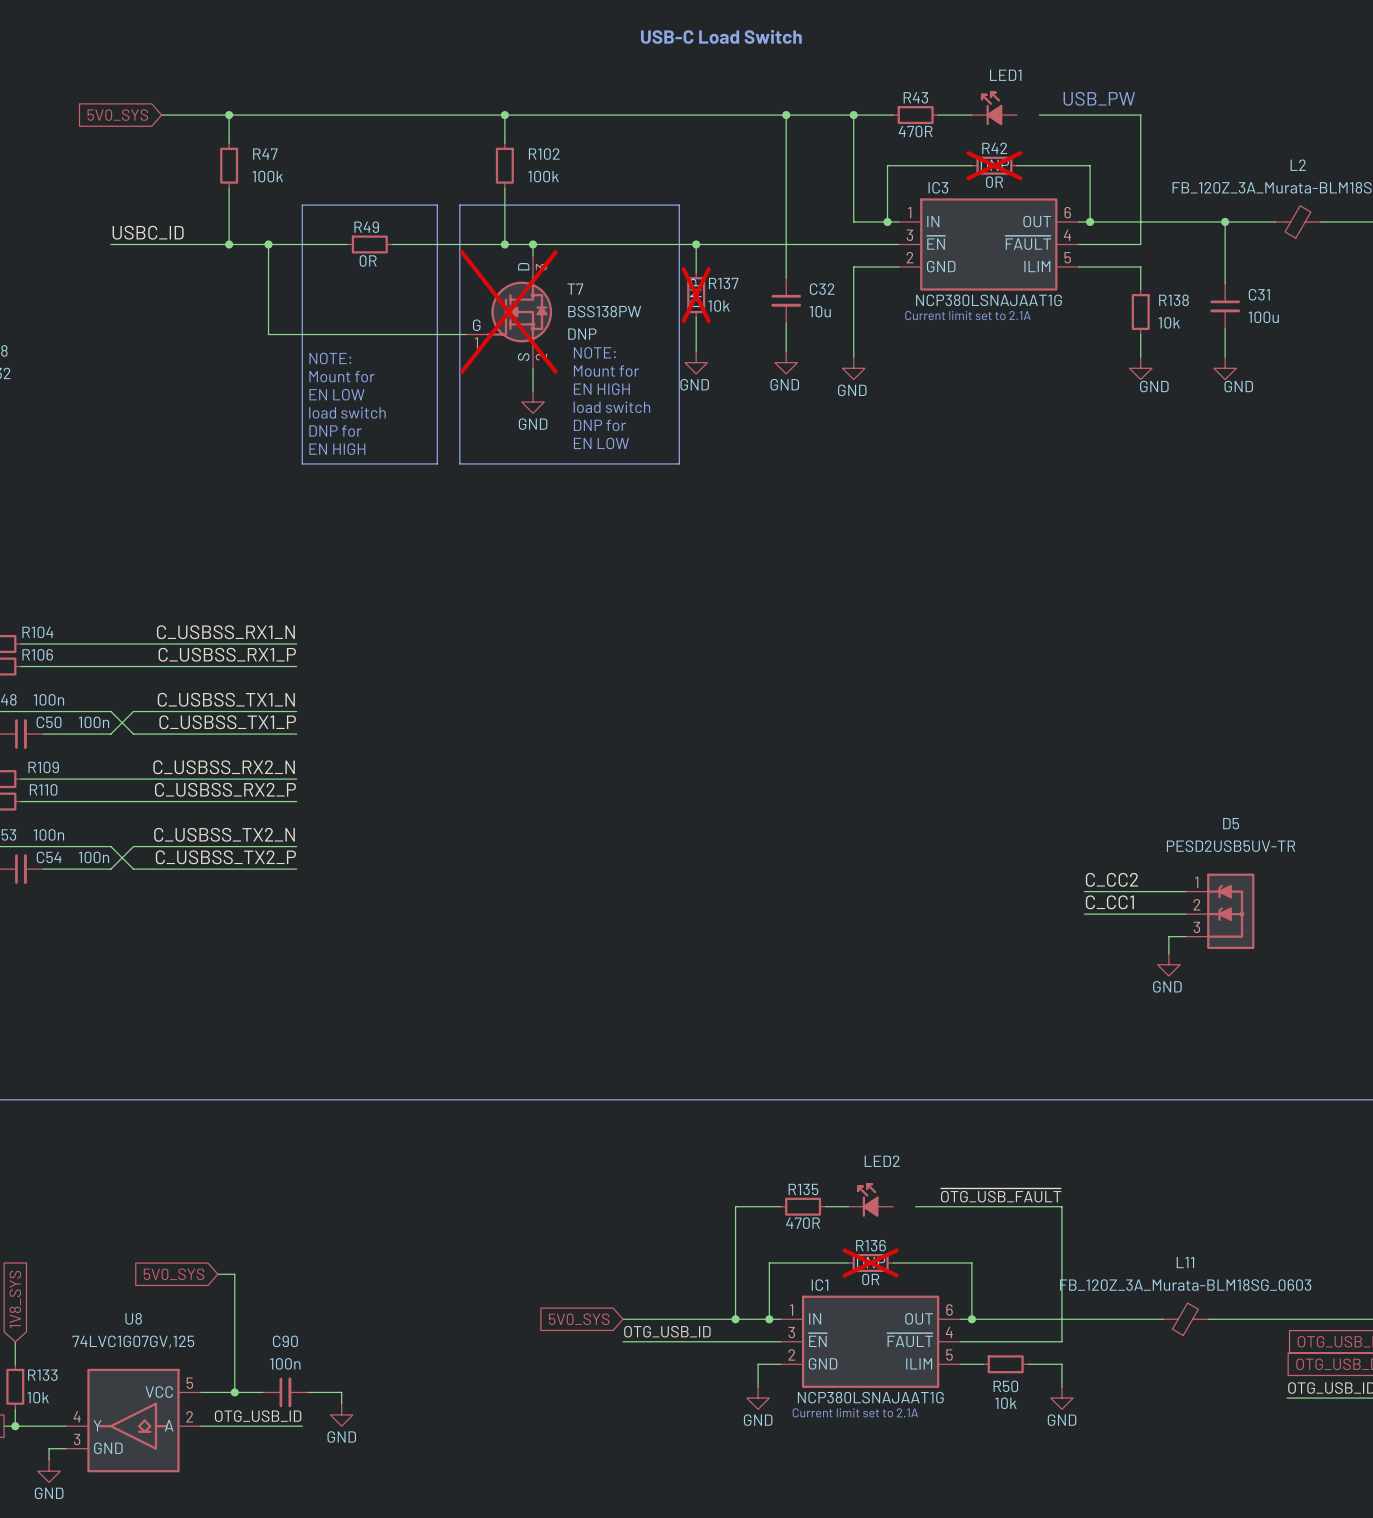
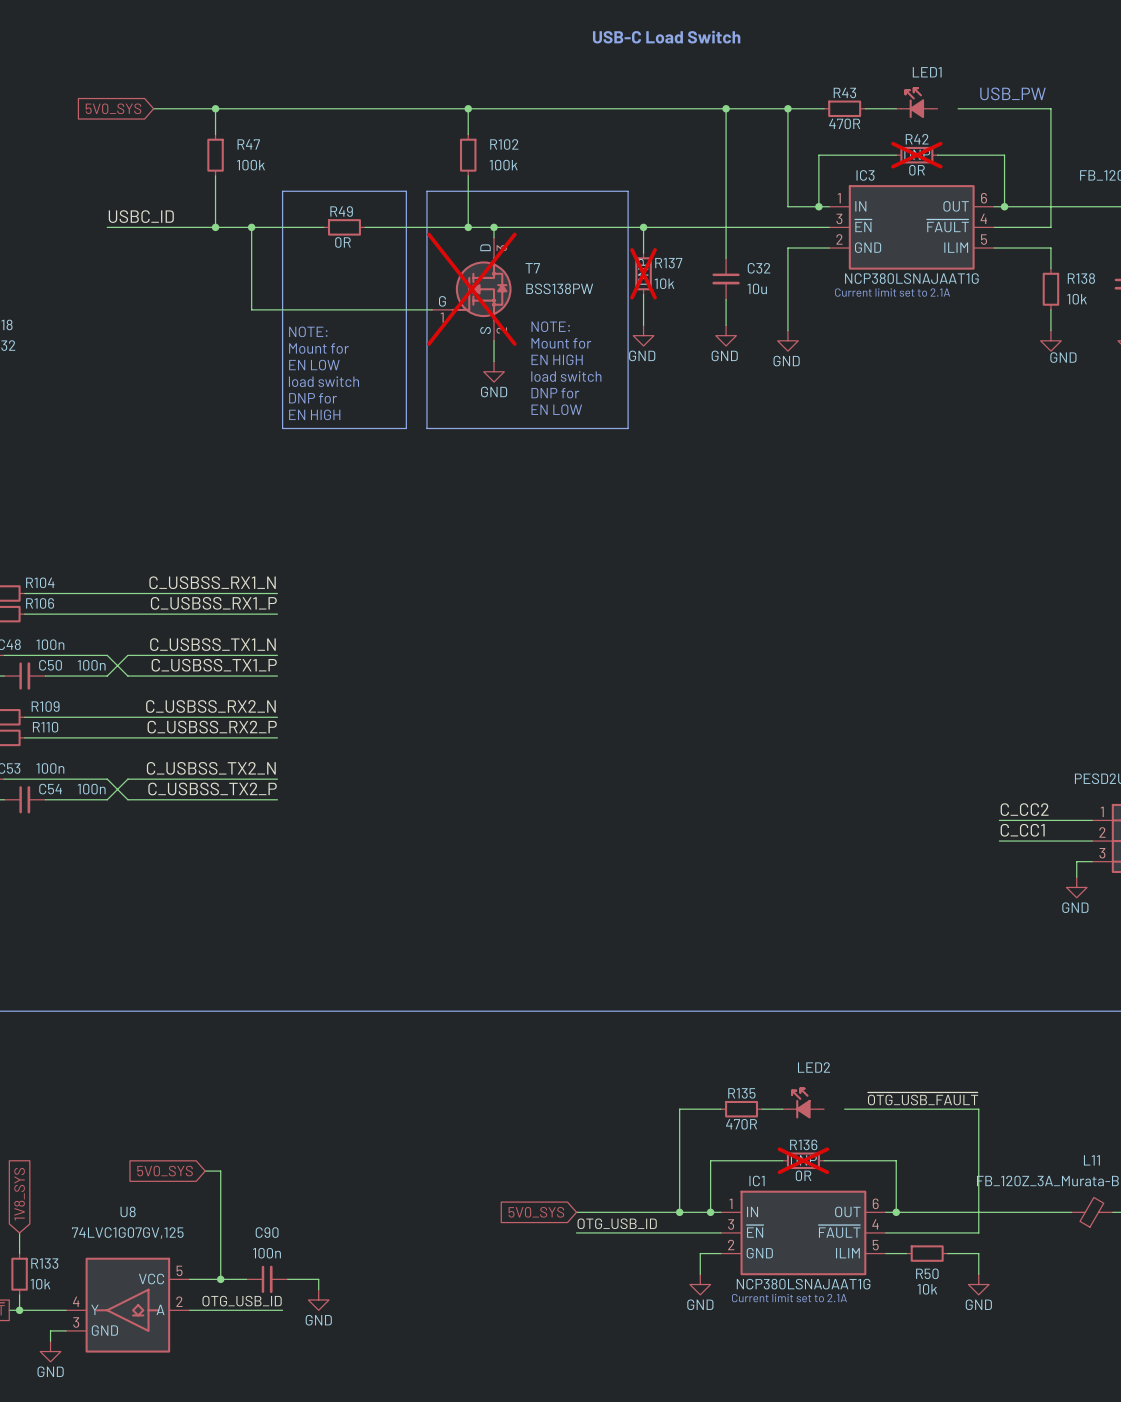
T7 text: DNP (582, 334) -> none

